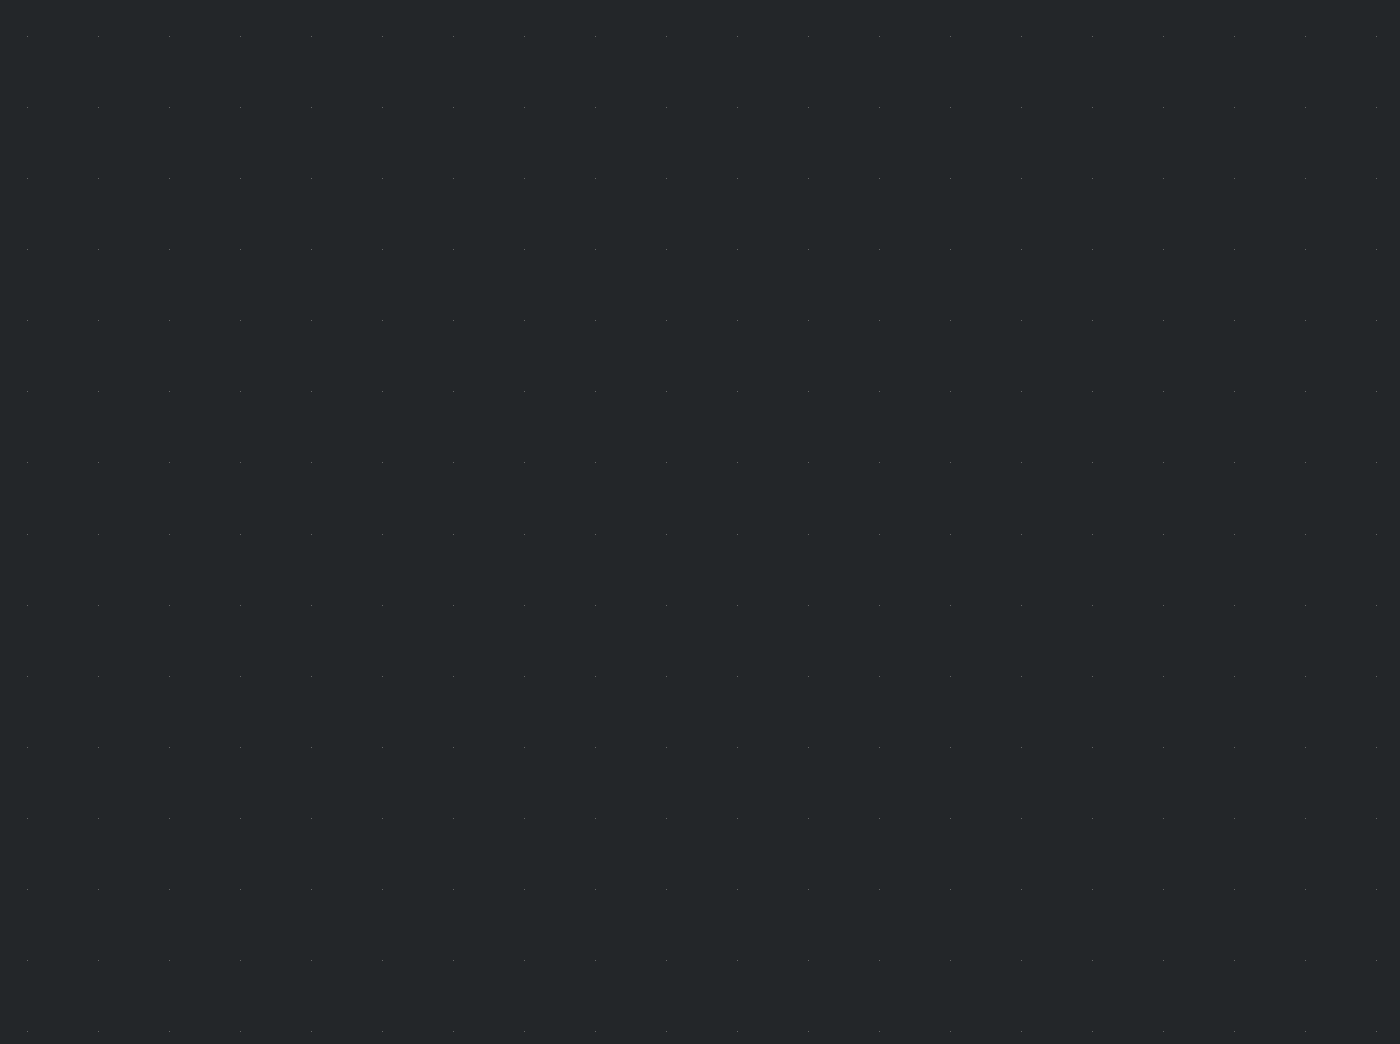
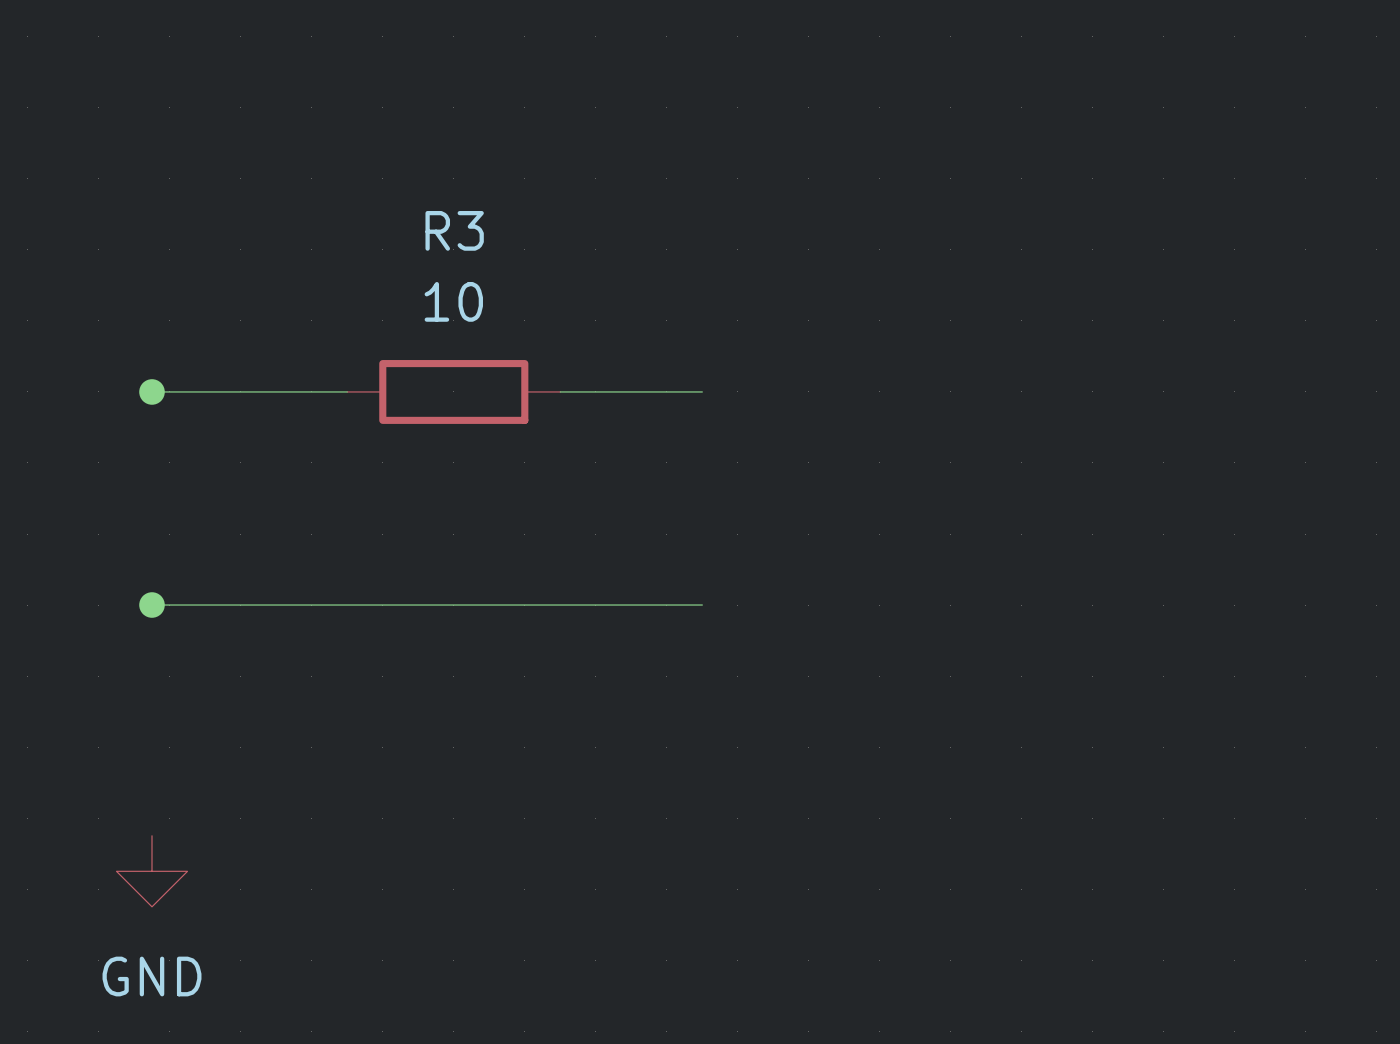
wire: none -> (151, 391) (347, 391)
junction: none -> (151, 391)
R3: none -> 10 (453, 391)
wire: none -> (560, 391) (702, 391)
wire: none -> (151, 605) (702, 605)
junction: none -> (151, 605)
power symbol: none -> GND (151, 871)

